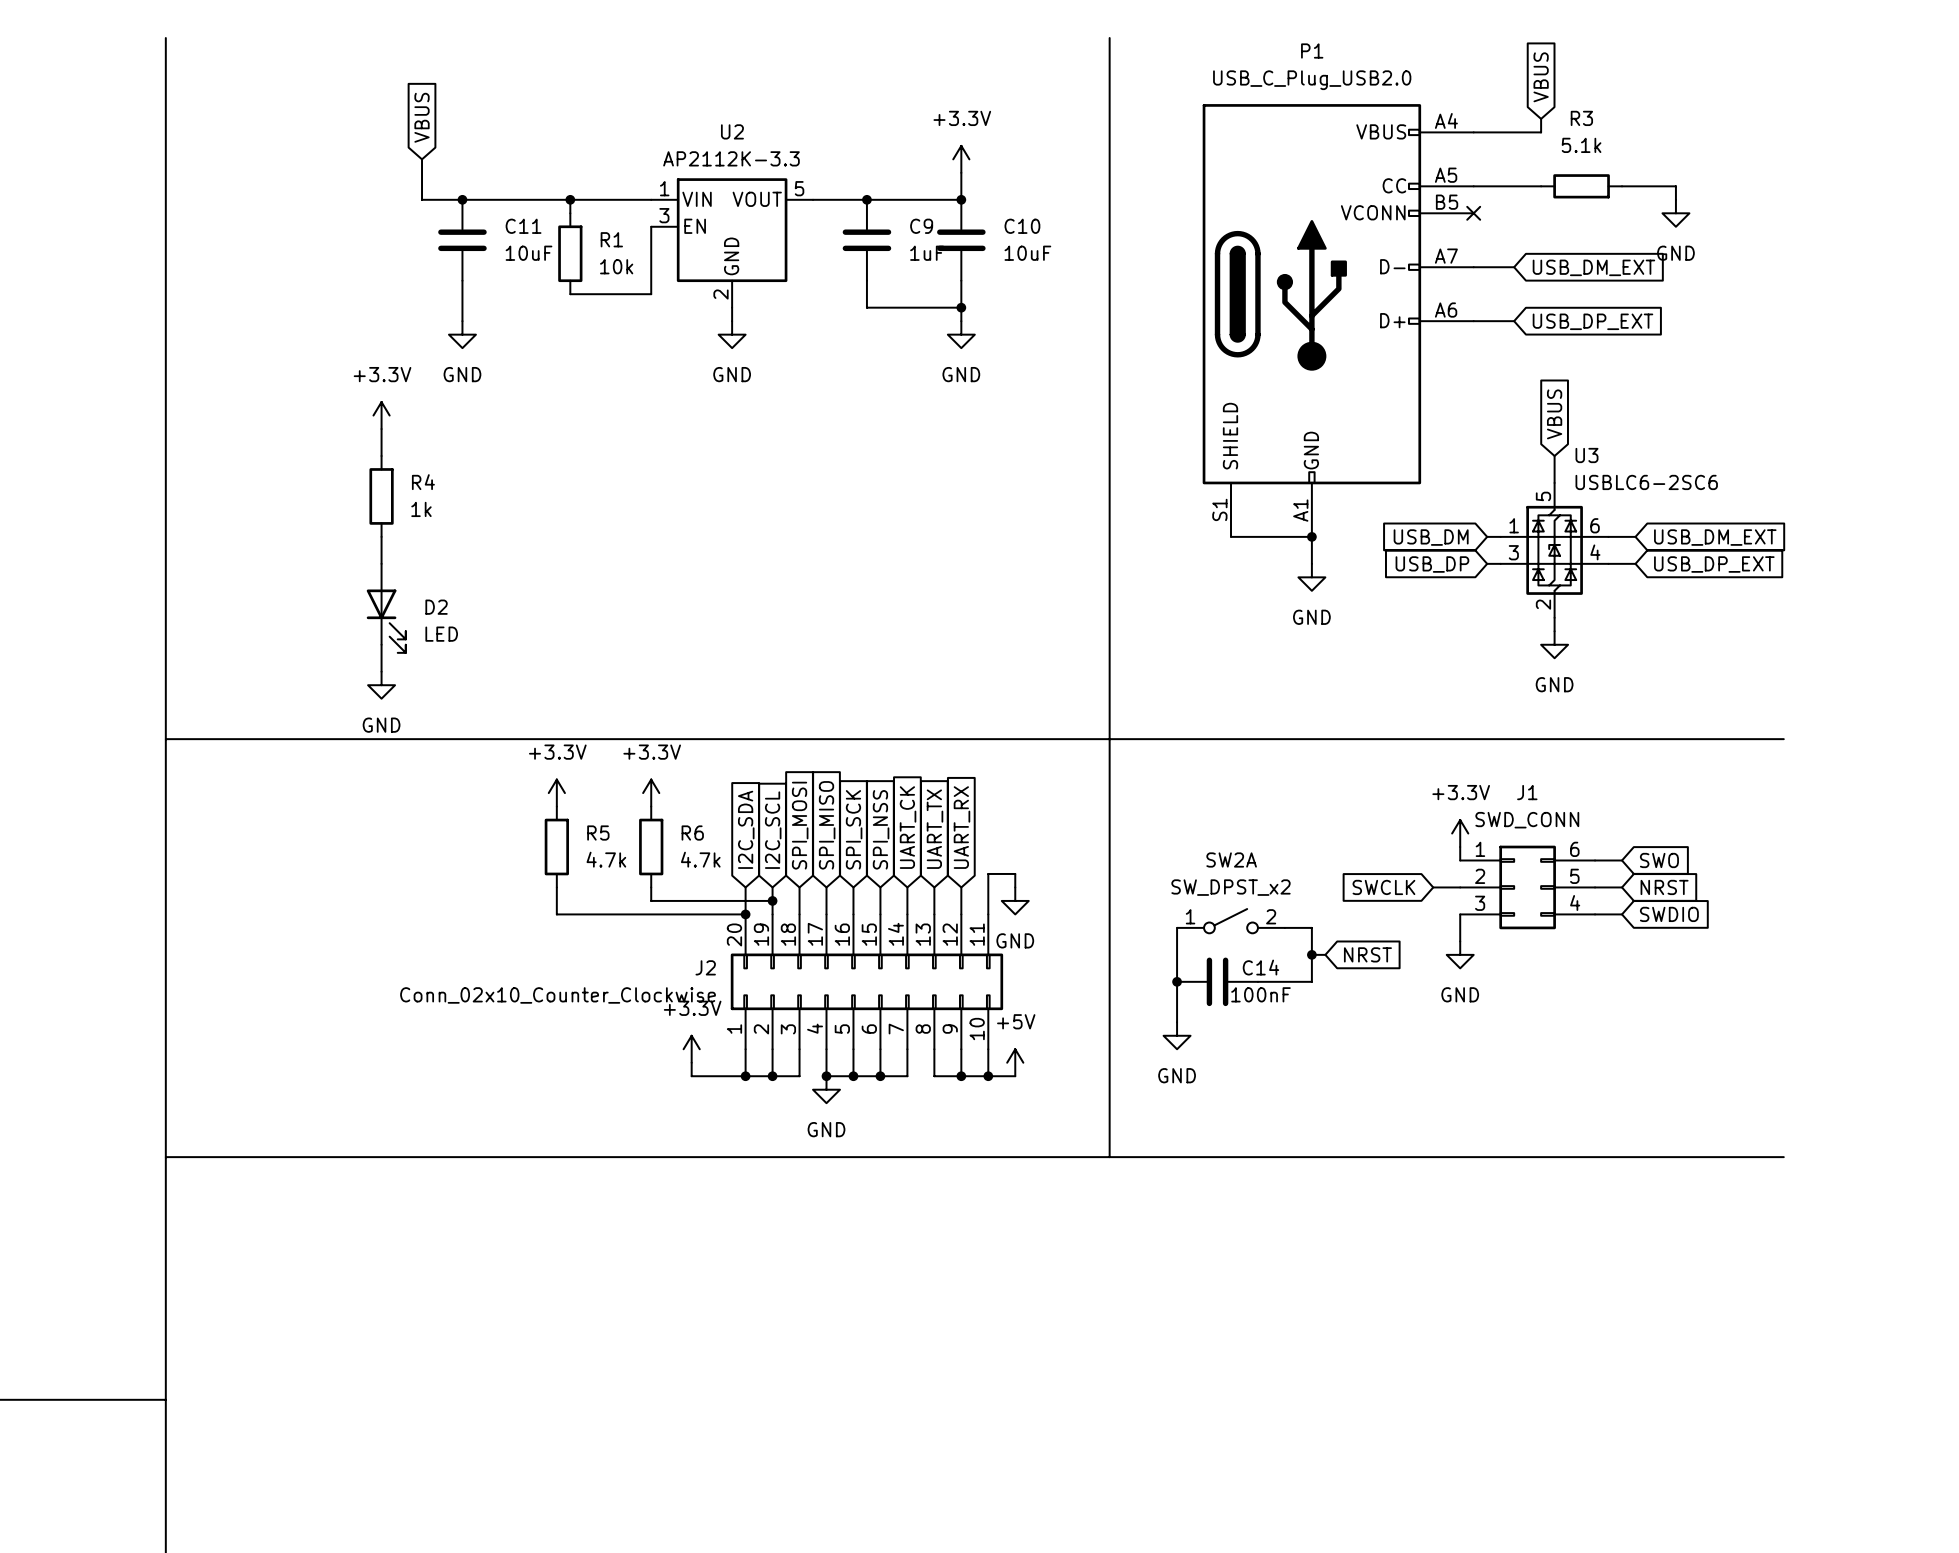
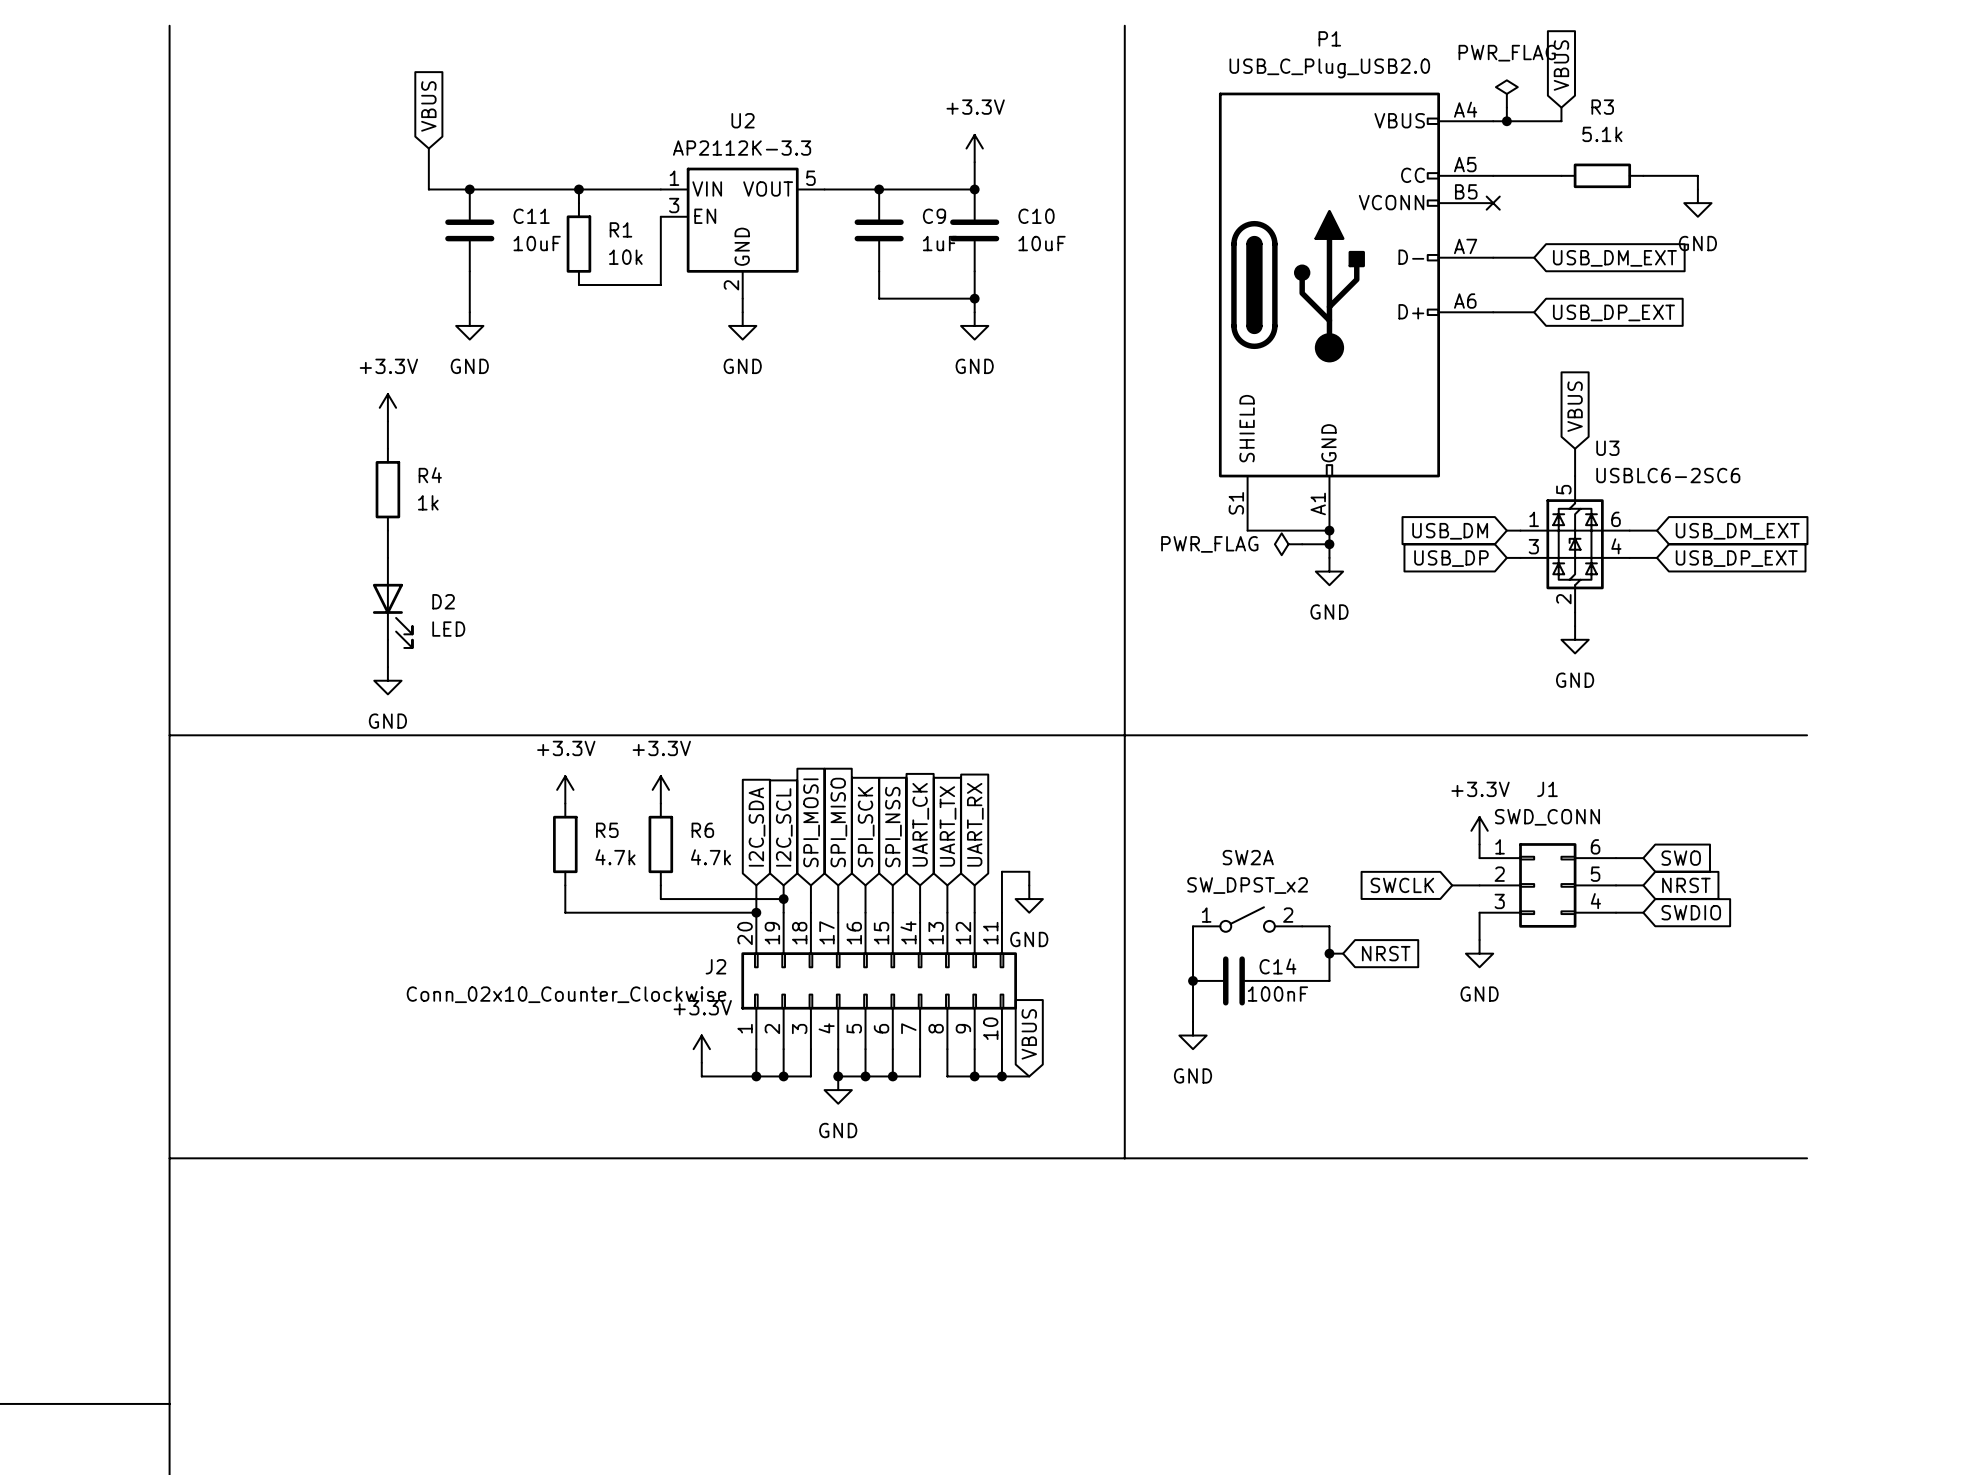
power symbol: none -> PWR_FLAG (1506, 93)
wire: none -> (1506, 107) (1506, 121)
junction: none -> (1506, 121)
power symbol: none -> PWR_FLAG (1288, 544)
wire: none -> (1302, 544) (1329, 544)
junction: none -> (1329, 544)
global label: none -> VBUS (1029, 1034)
power symbol: +5V (1015, 1062) -> none

